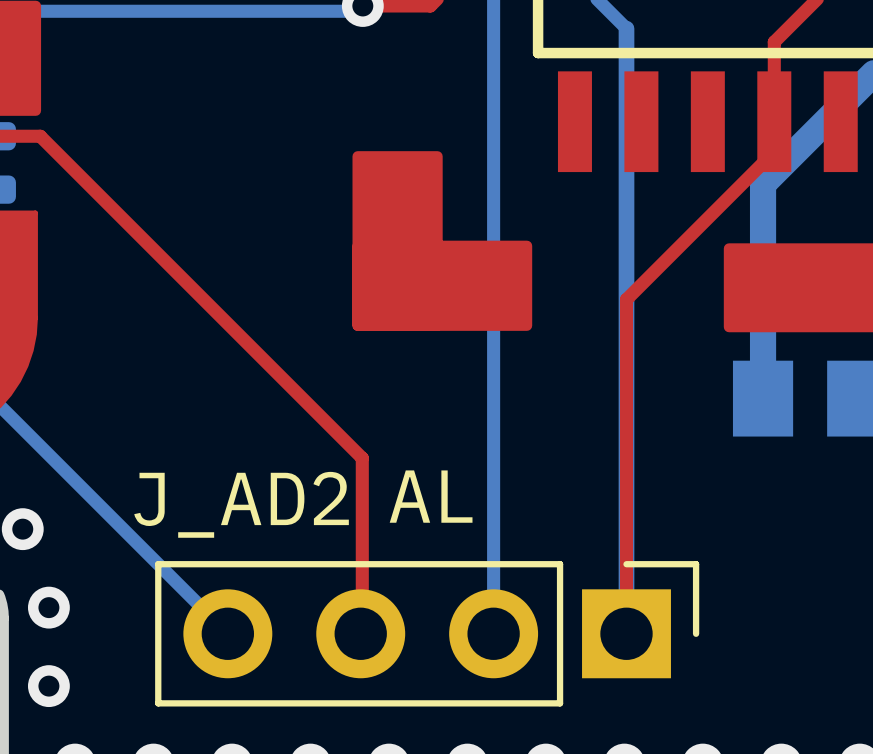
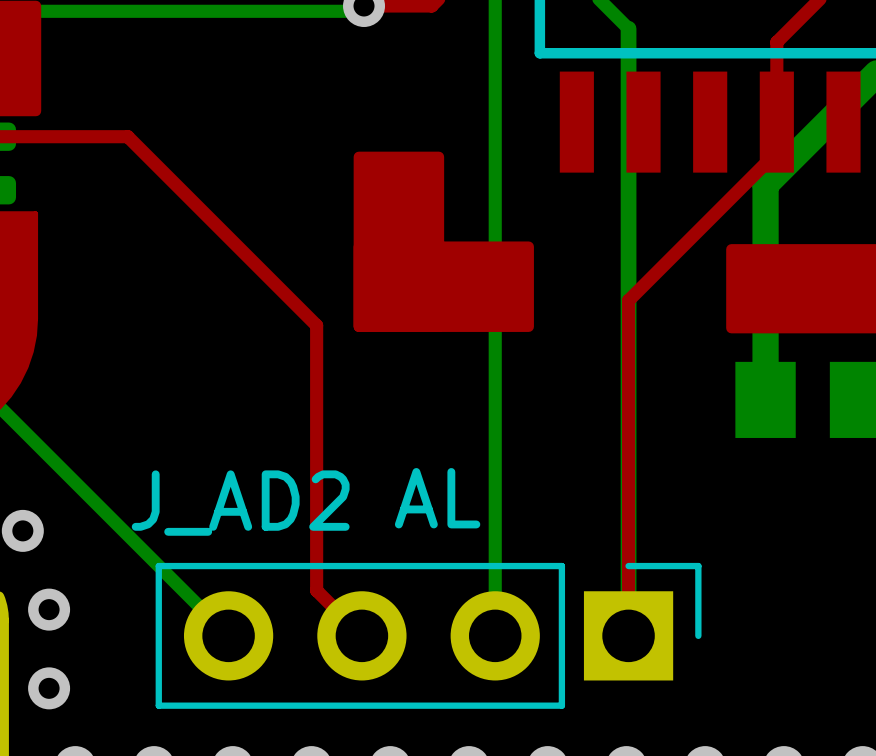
top track: (40, 136) (362, 458) (362, 632) (360, 633) -> (40, 136) (127, 136) (316, 325) (316, 590) (361, 635)

